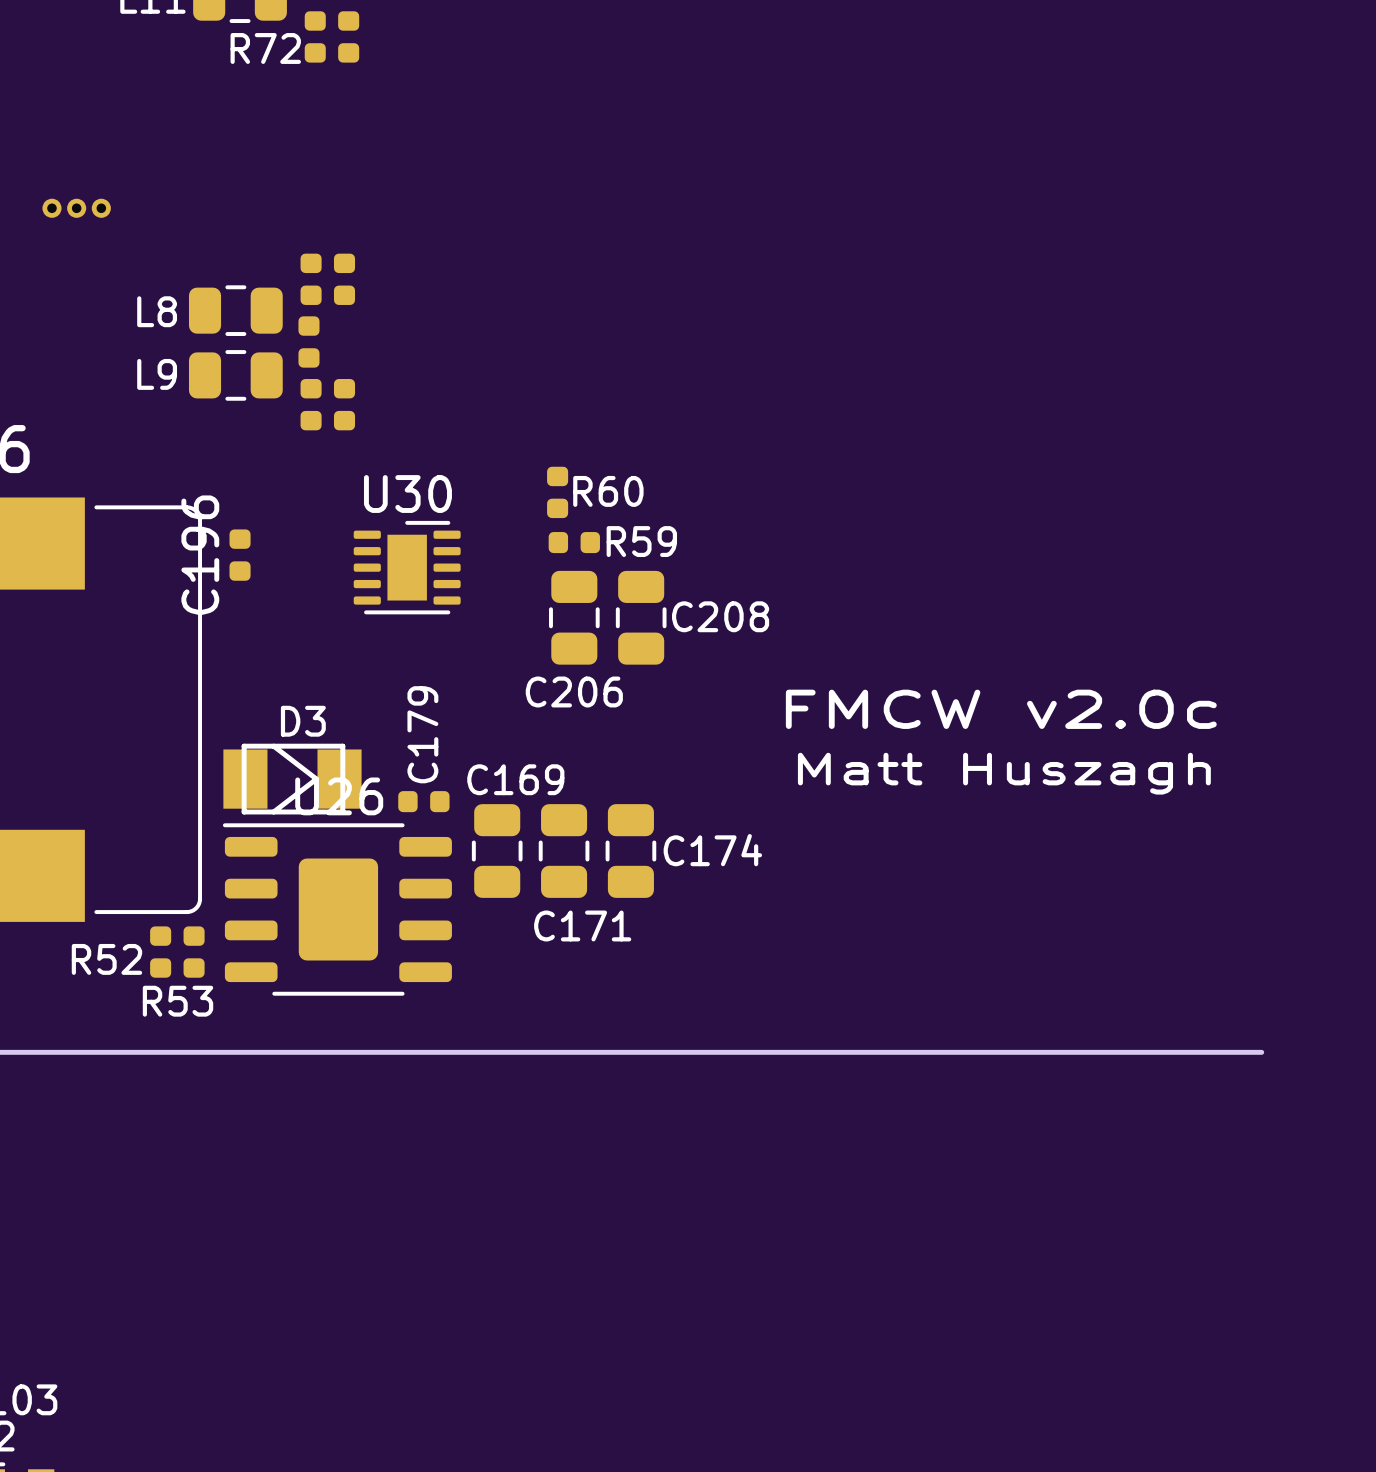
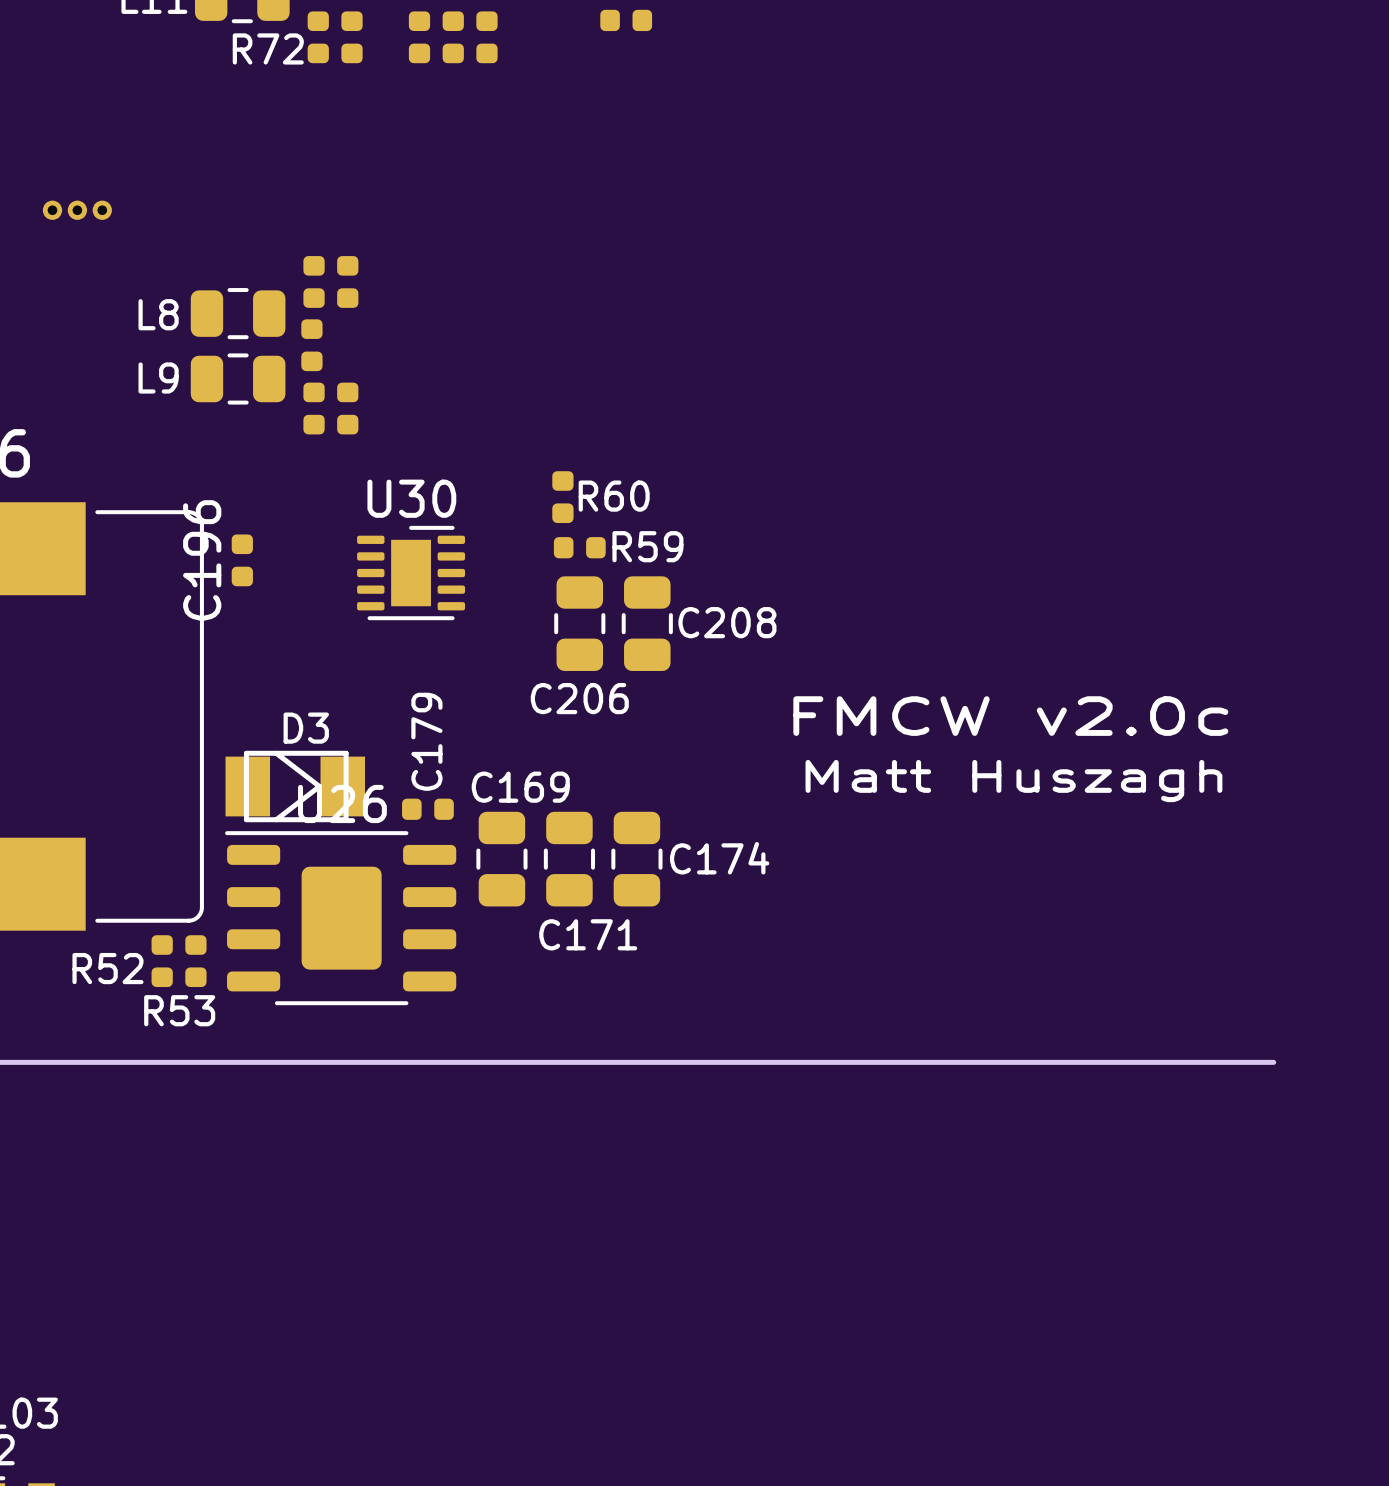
part: none -> (626, 20)
part: none -> (419, 37)
part: none -> (453, 37)
part: none -> (486, 37)

